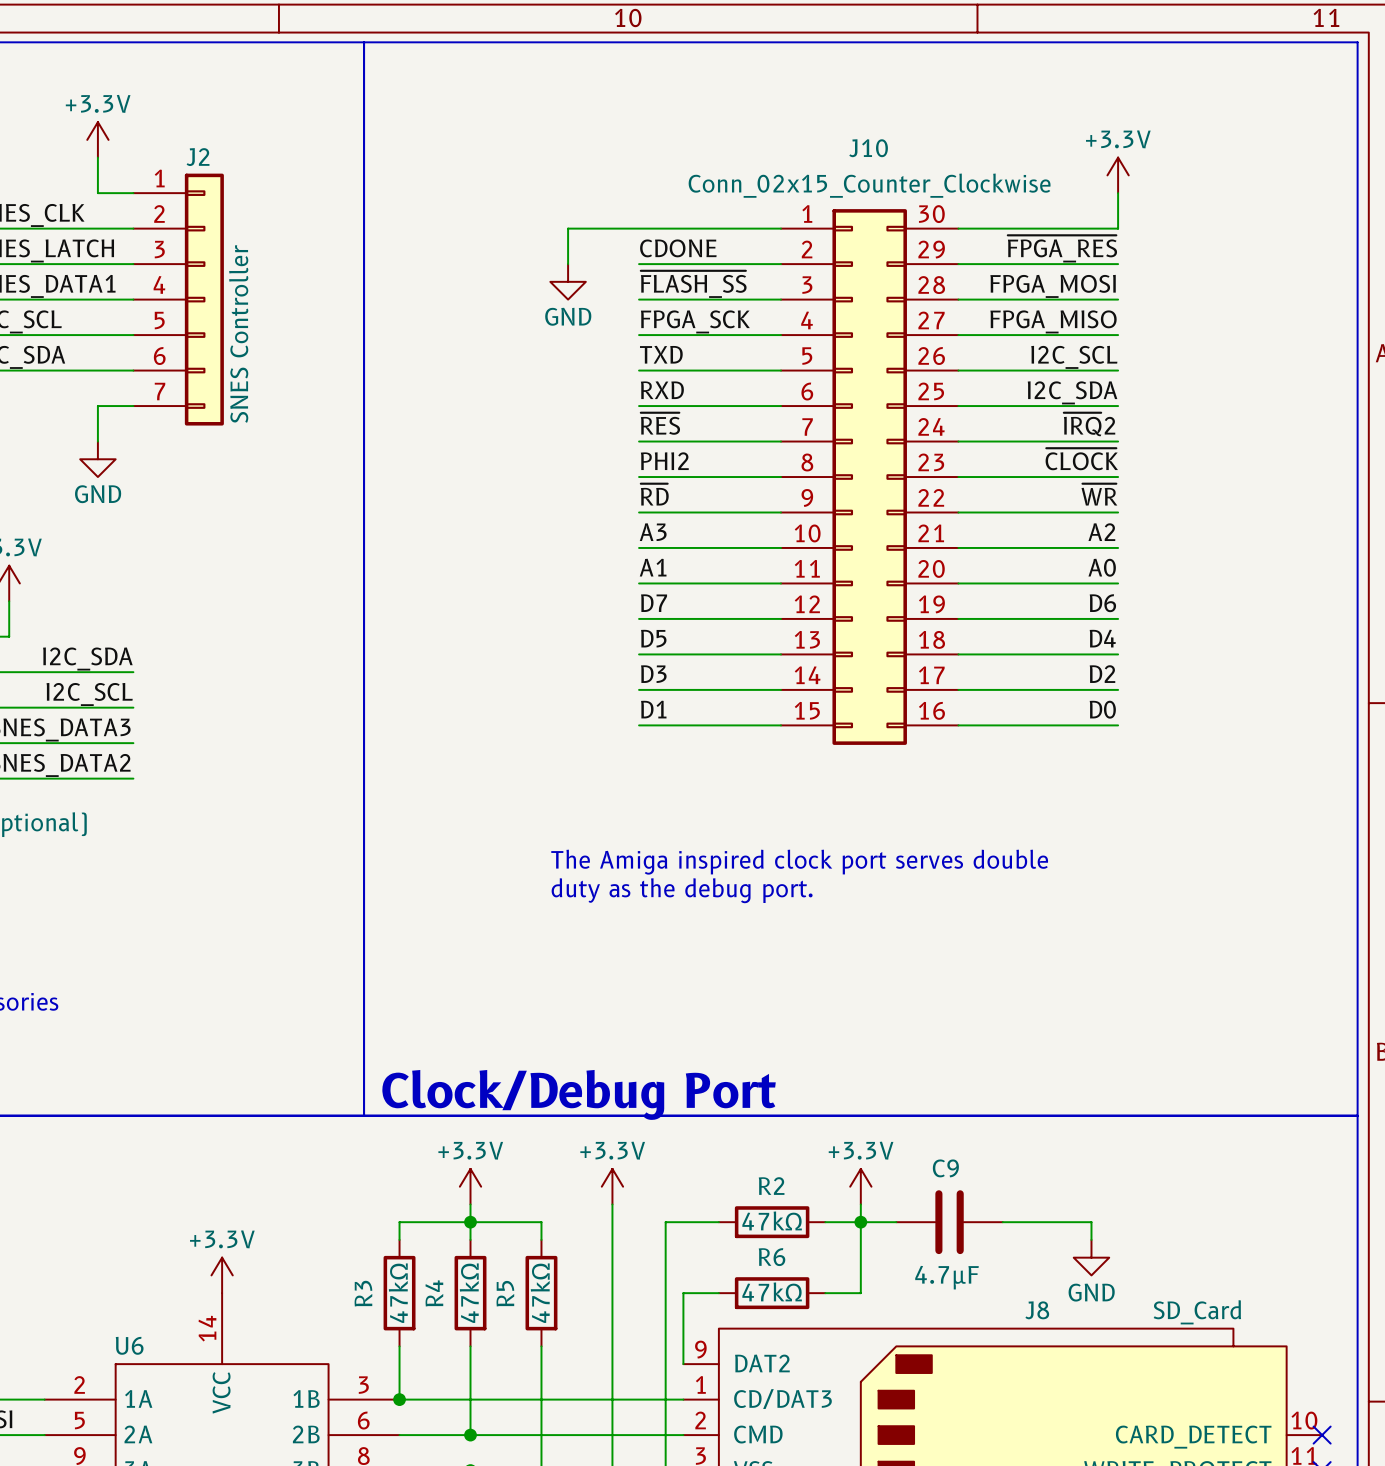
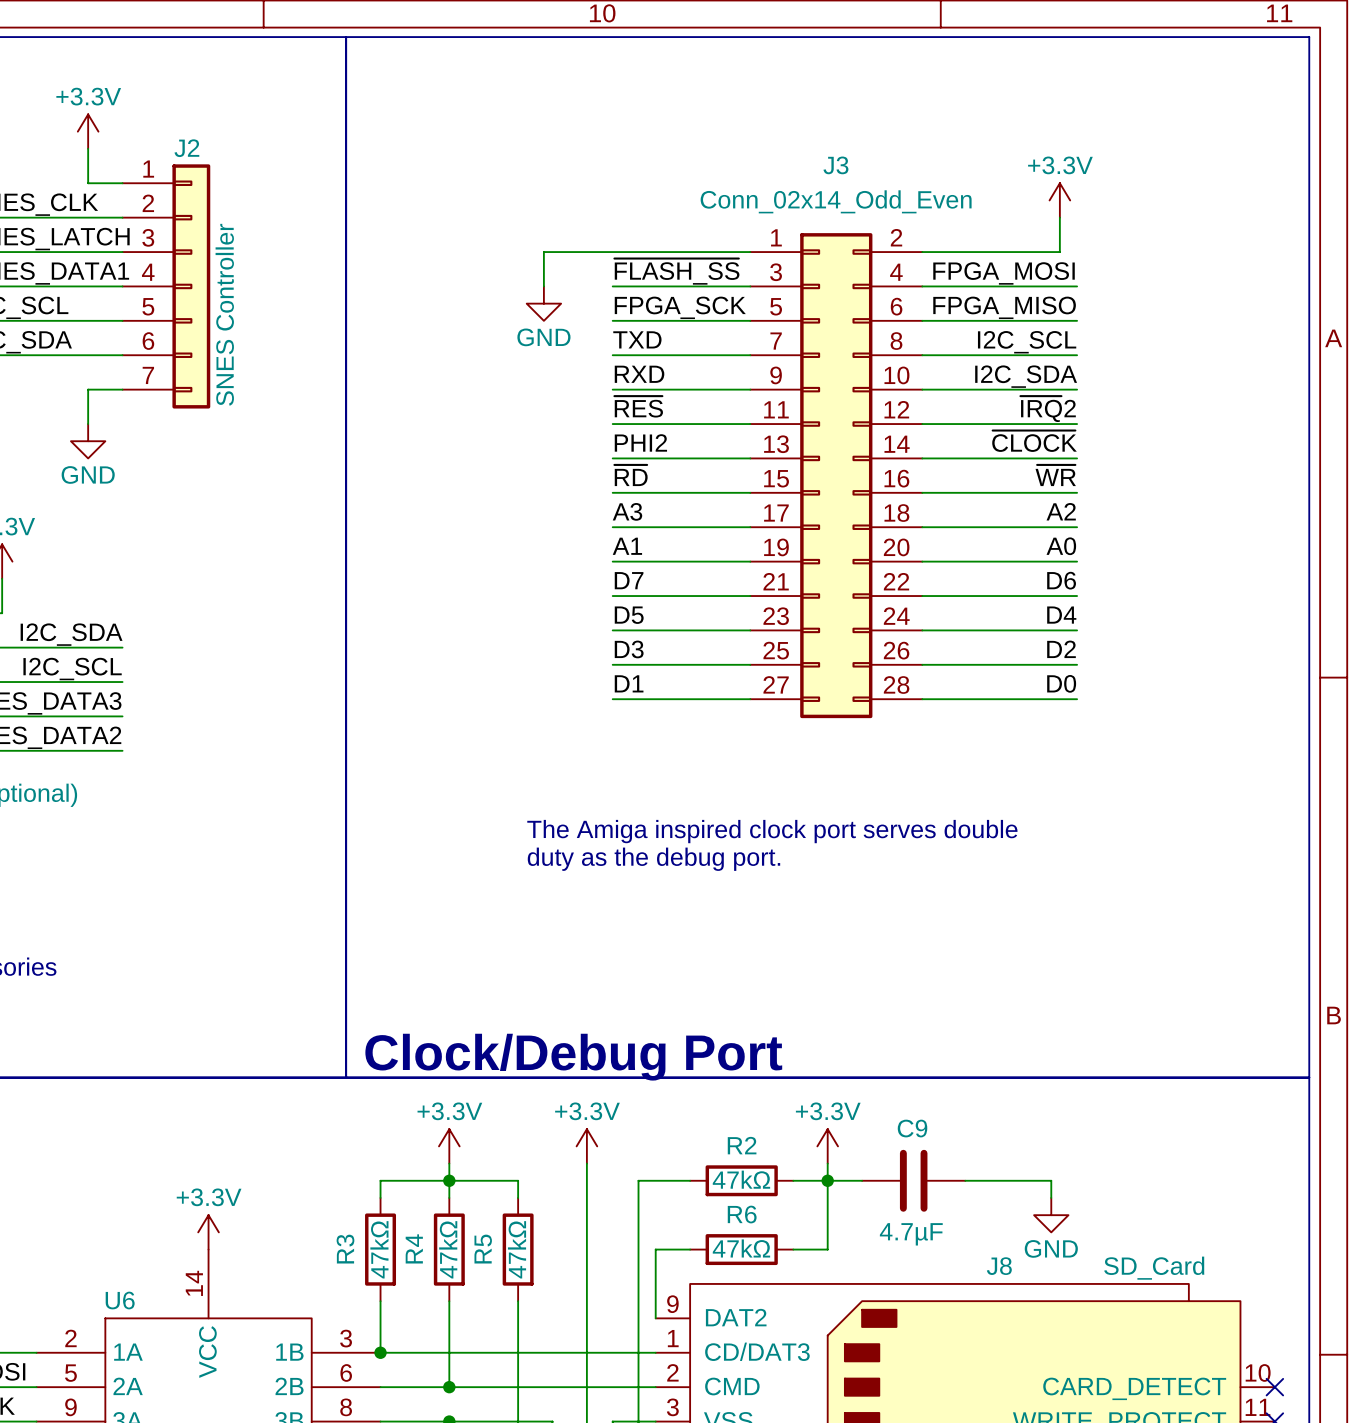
power symbol position: +3.3V (1118, 175) -> +3.3V (1059, 200)
wire: (1118, 193) (1118, 228) (958, 228) -> none
wire: (780, 228) (568, 228) (568, 264) -> none
label: CDONE (678, 248) -> none
label: ~{FPGA_RES} (1062, 248) -> none
wire: none -> (612, 252) (543, 252) (543, 286)
wire: (1100, 264) (1118, 264) -> (1059, 252) (1059, 217)
power symbol position: GND (568, 281) -> GND (543, 303)
J10: Conn_02x15_Counter_Clockwise (869, 477) -> none
J3: none -> Conn_02x14_Odd_Even (836, 475)

